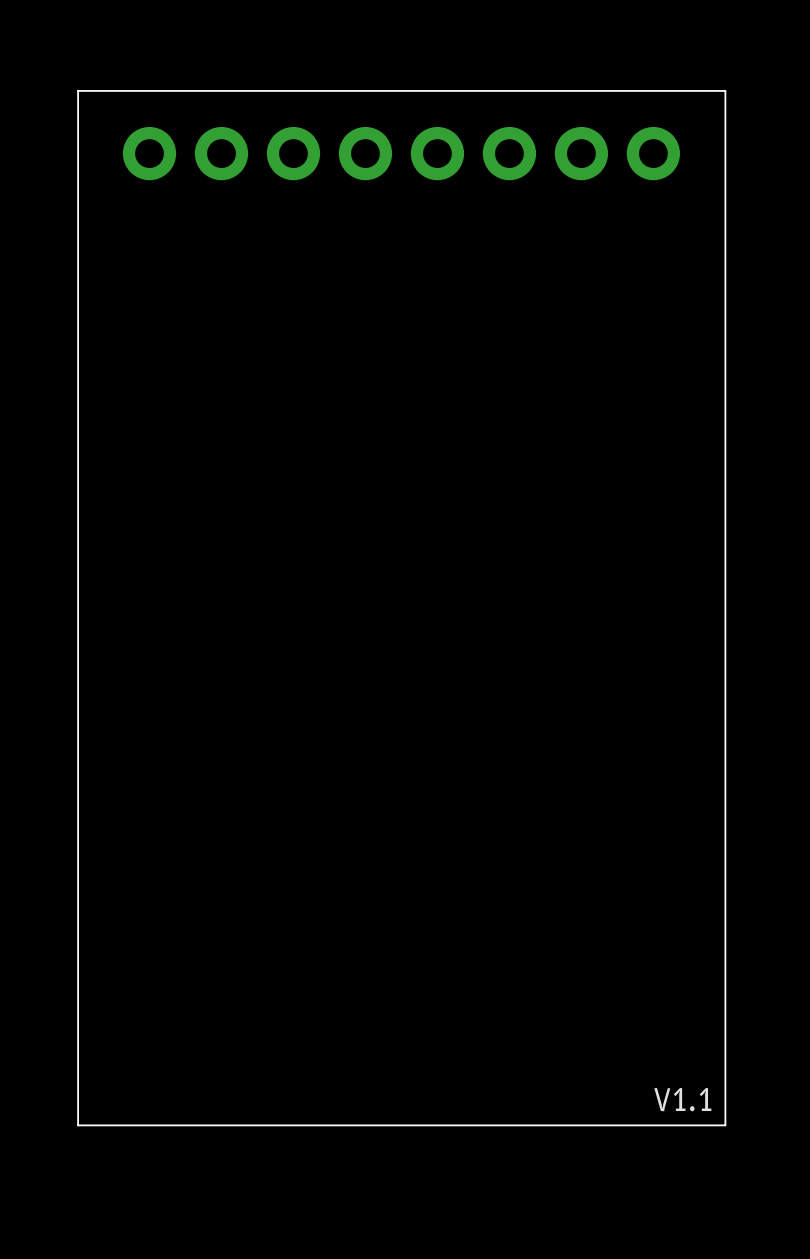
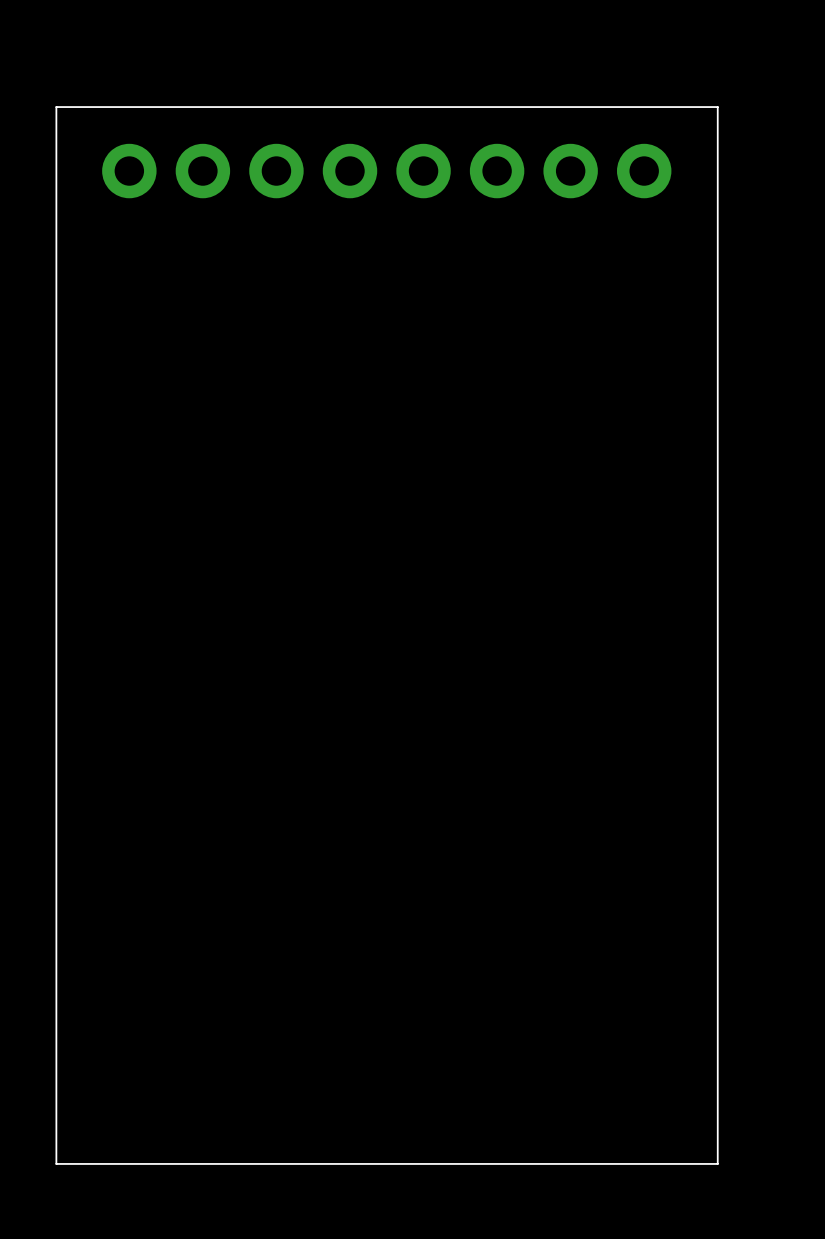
text: V1.1 (682, 1099) -> none

